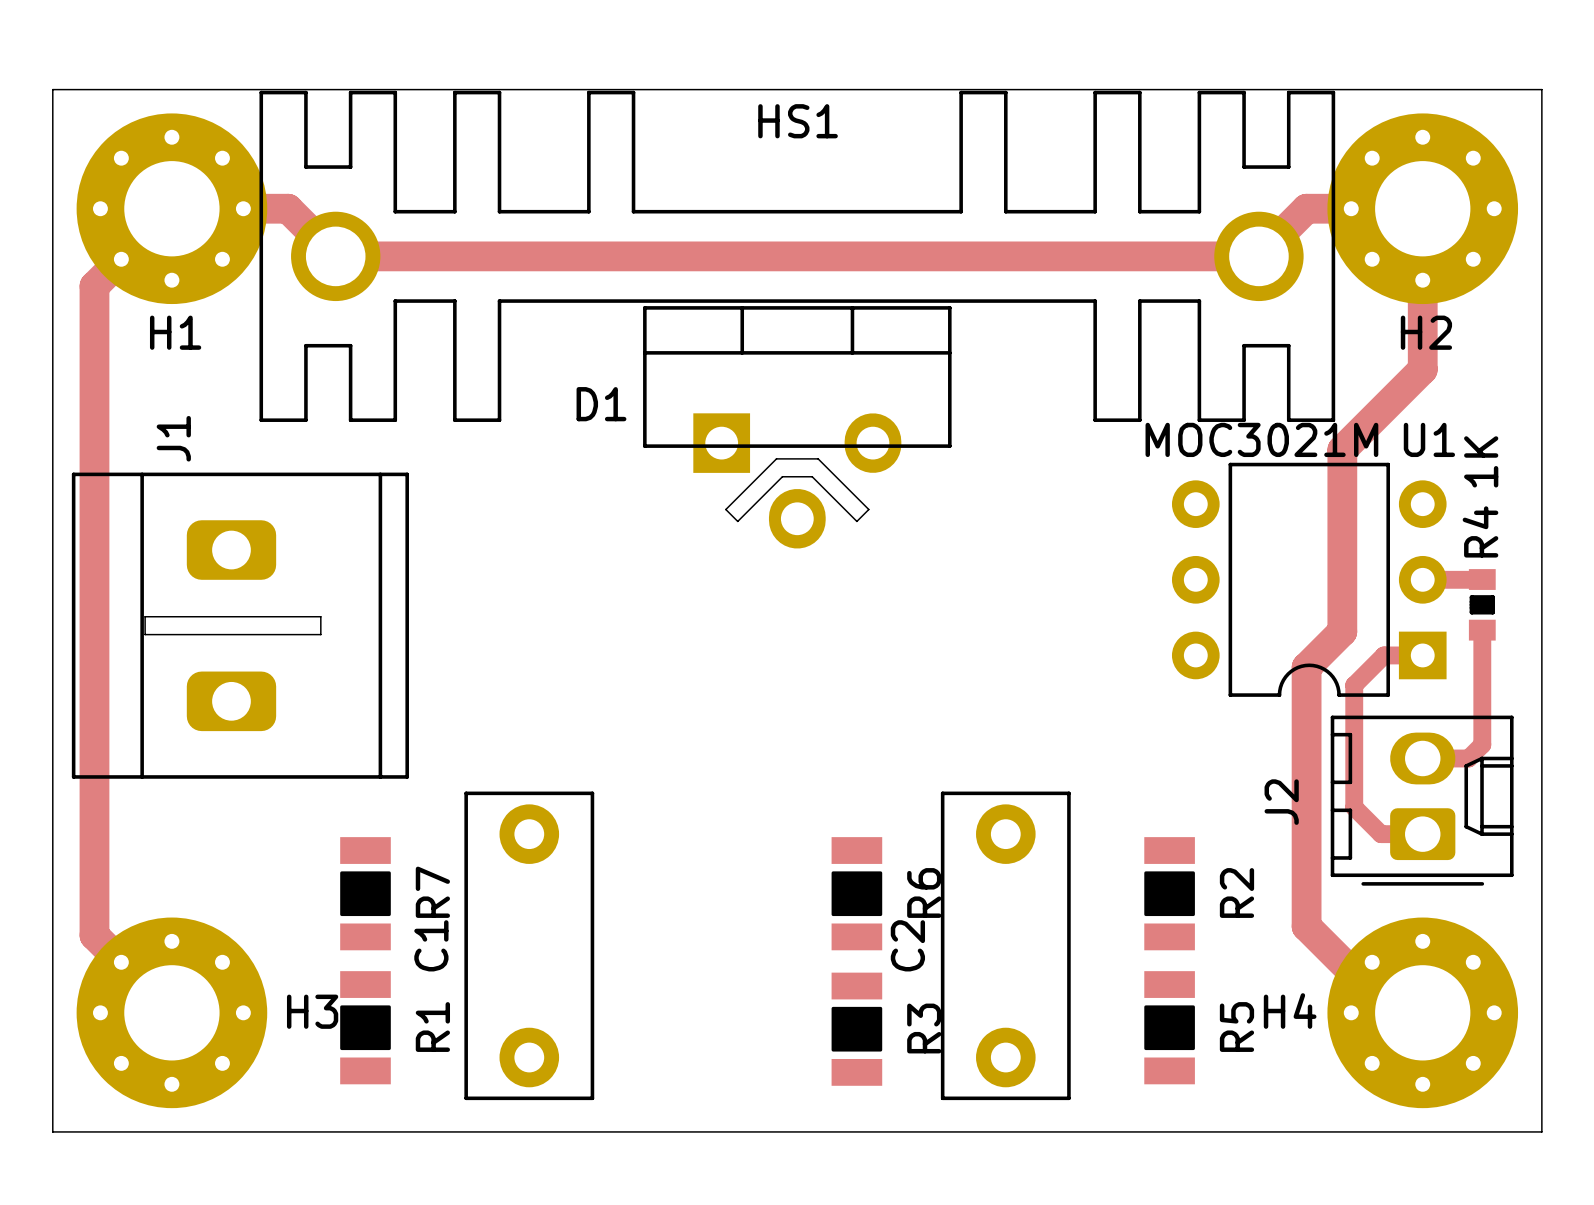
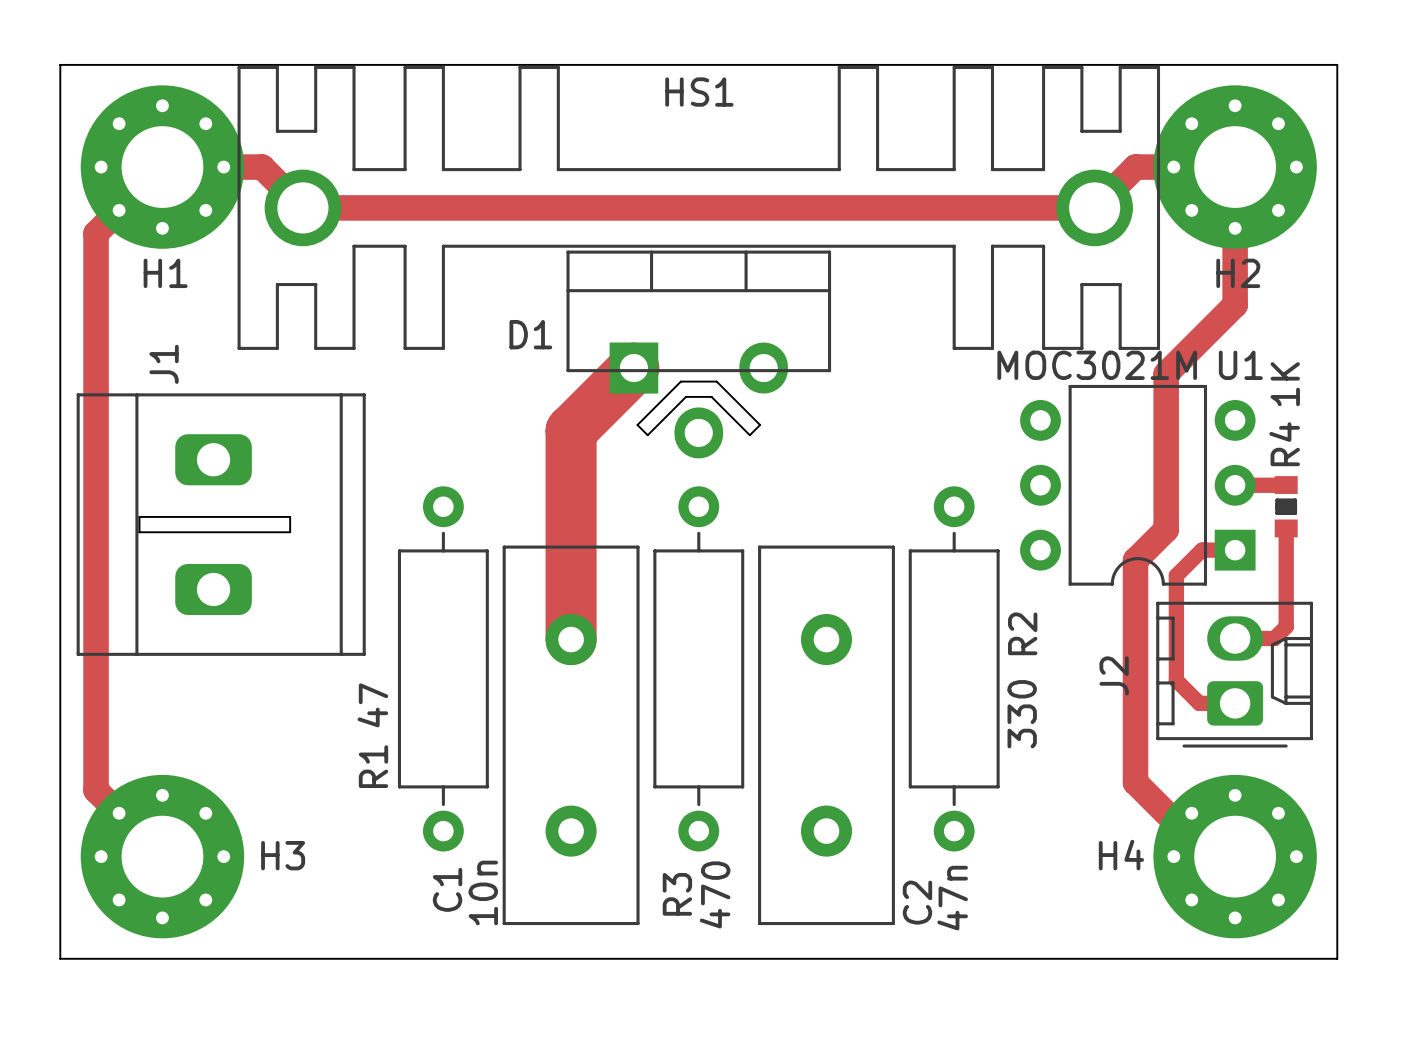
track: none -> (633, 368) (571, 430) (571, 639)
C1 footprint: [464, 791, 595, 1101] -> [502, 545, 640, 926]
C2 footprint: [940, 791, 1071, 1101] -> [758, 545, 895, 926]
R1 value: none -> 47 (372, 705)
R2 footprint: [1144, 837, 1195, 951] -> [908, 486, 1000, 852]
R2 value: none -> 330 (1022, 714)
R7: (365, 893) -> none
R6: (856, 893) -> none
C1 name position: C1 (431, 945) -> C1 (447, 889)
C2 name position: C2 (907, 945) -> C2 (917, 902)
R1 footprint: [340, 971, 391, 1085] -> [397, 486, 489, 852]
R3 footprint: [831, 972, 883, 1086] -> [653, 486, 745, 852]
R1 name position: R1 (432, 1027) -> R1 (373, 766)
R5: (1169, 1027) -> none
R3 name position: R3 (924, 1028) -> R3 (677, 894)
C1 value: none -> 10n (483, 892)
R3 value: none -> 470 (715, 894)
C2 value: none -> 47n (952, 898)

